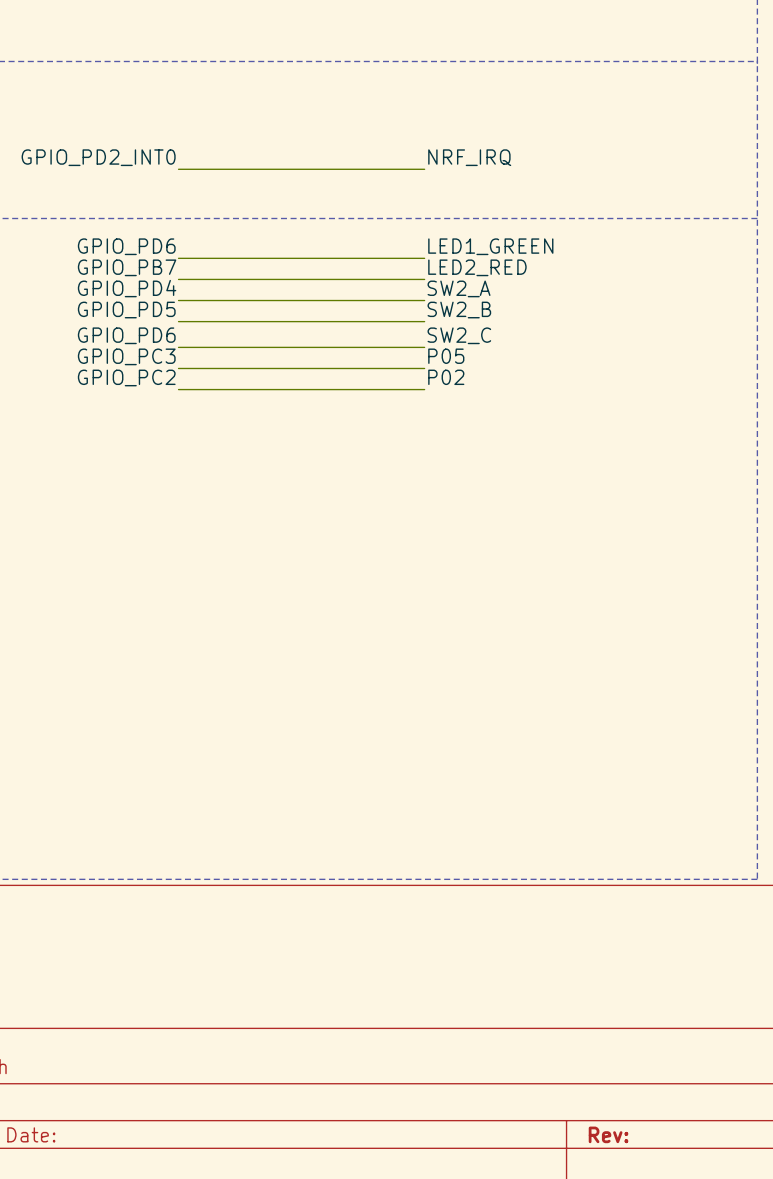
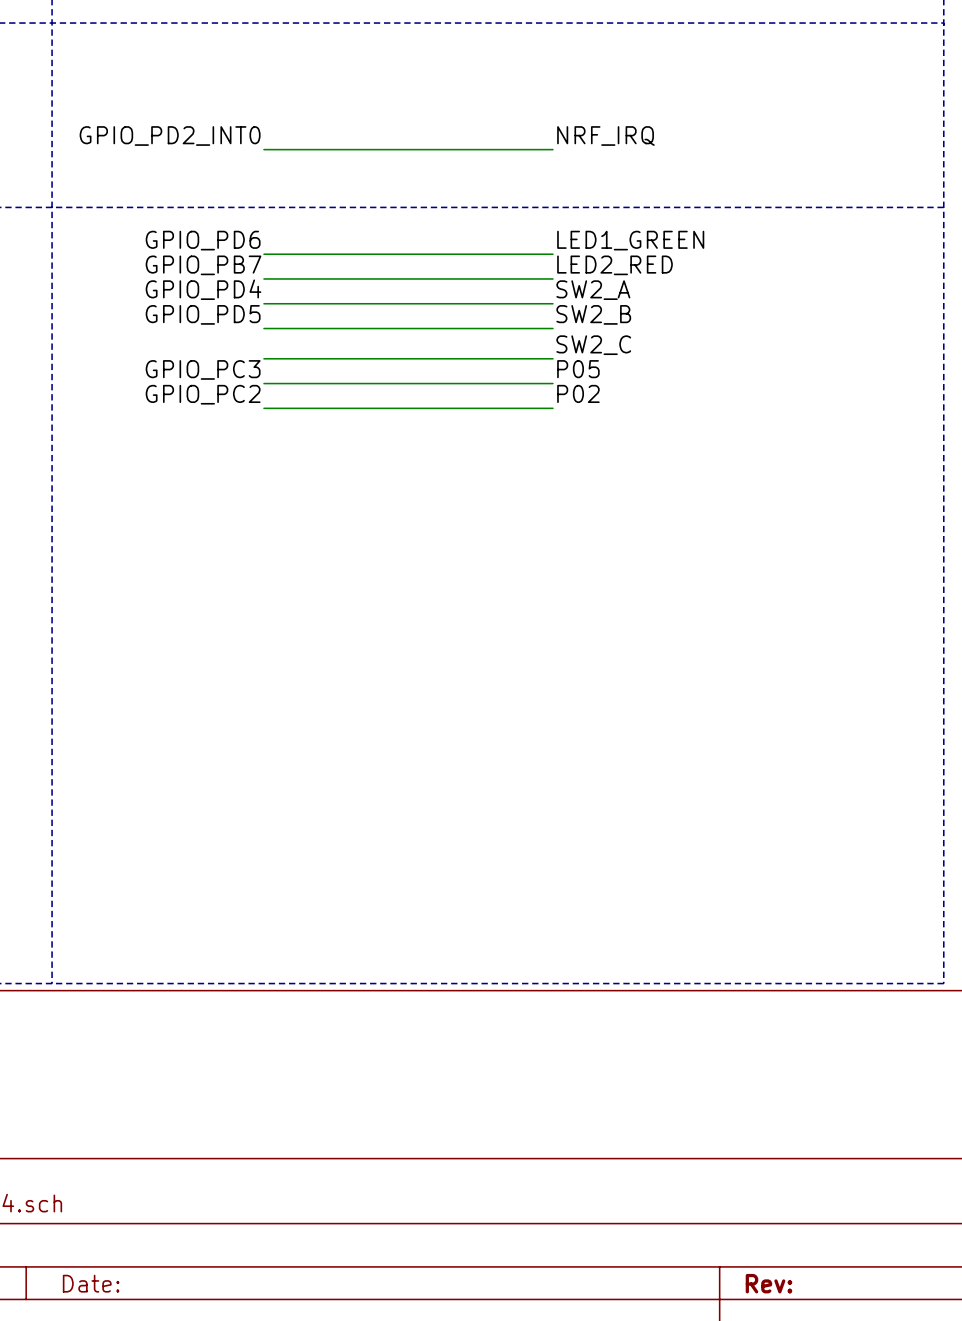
label: GPIO_PD6 (126, 335) -> none

